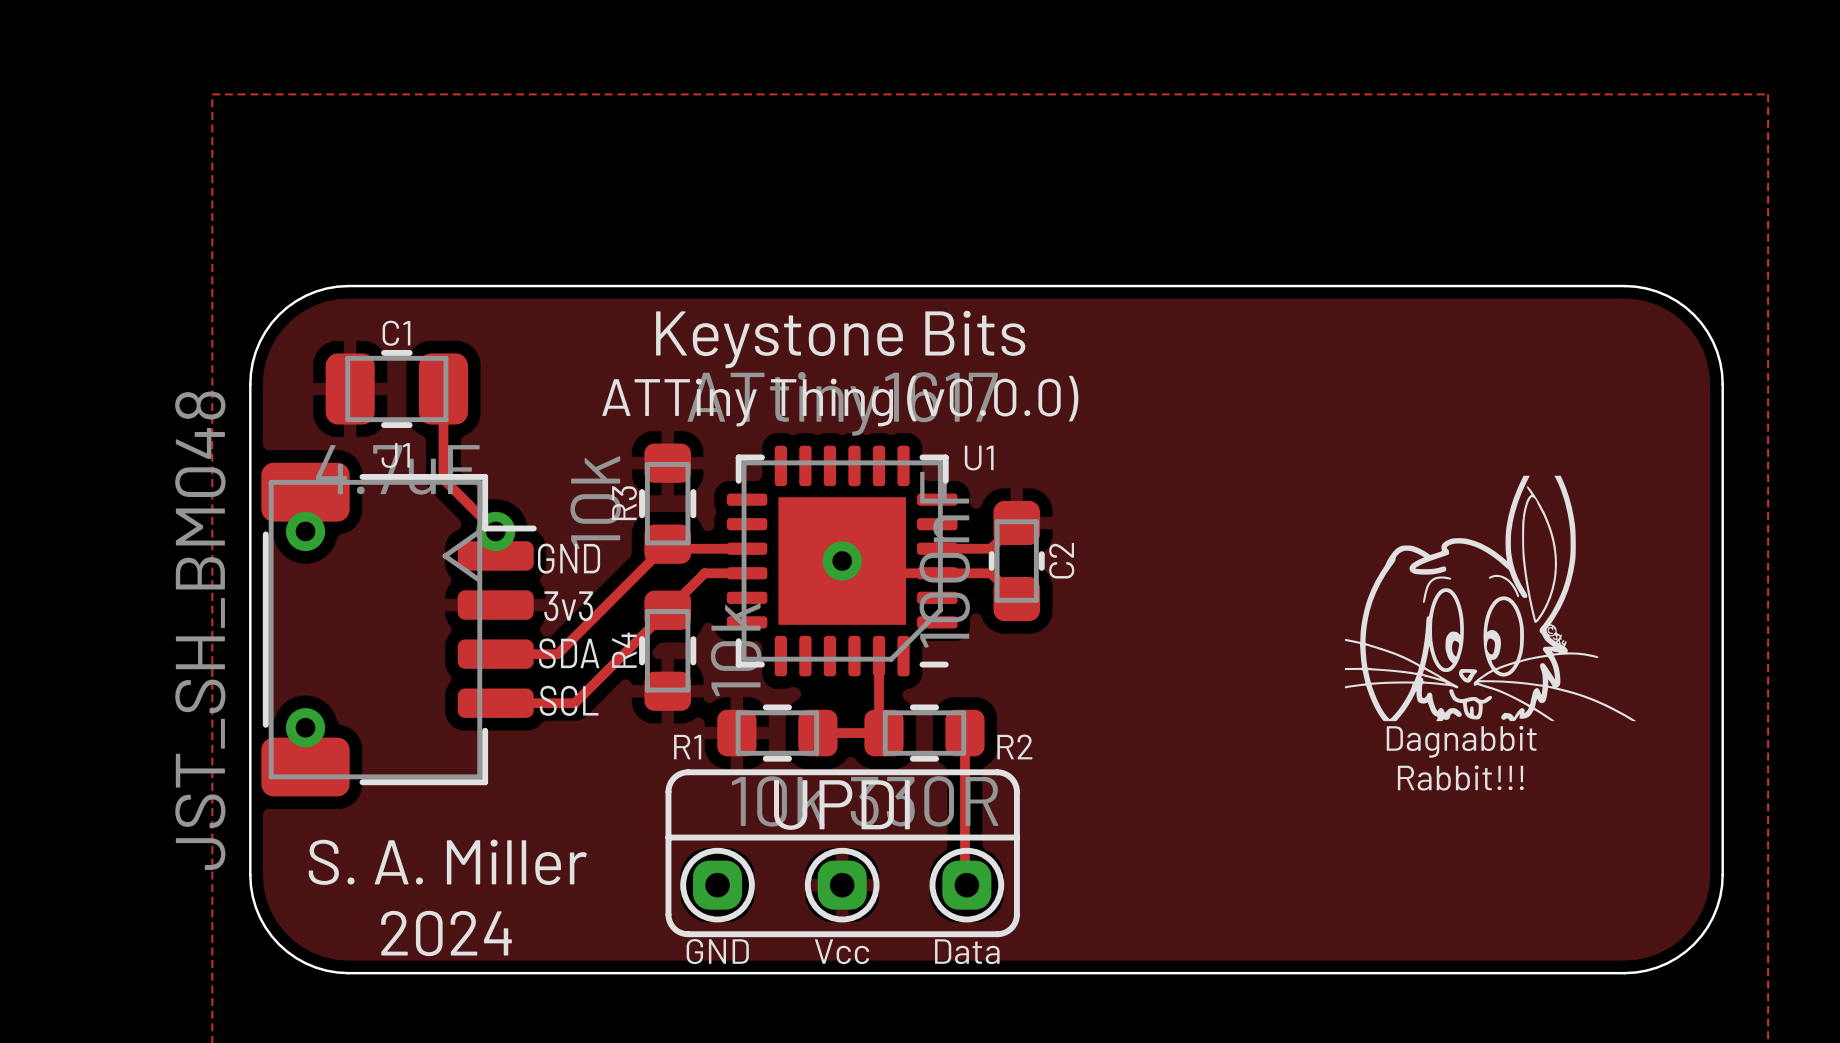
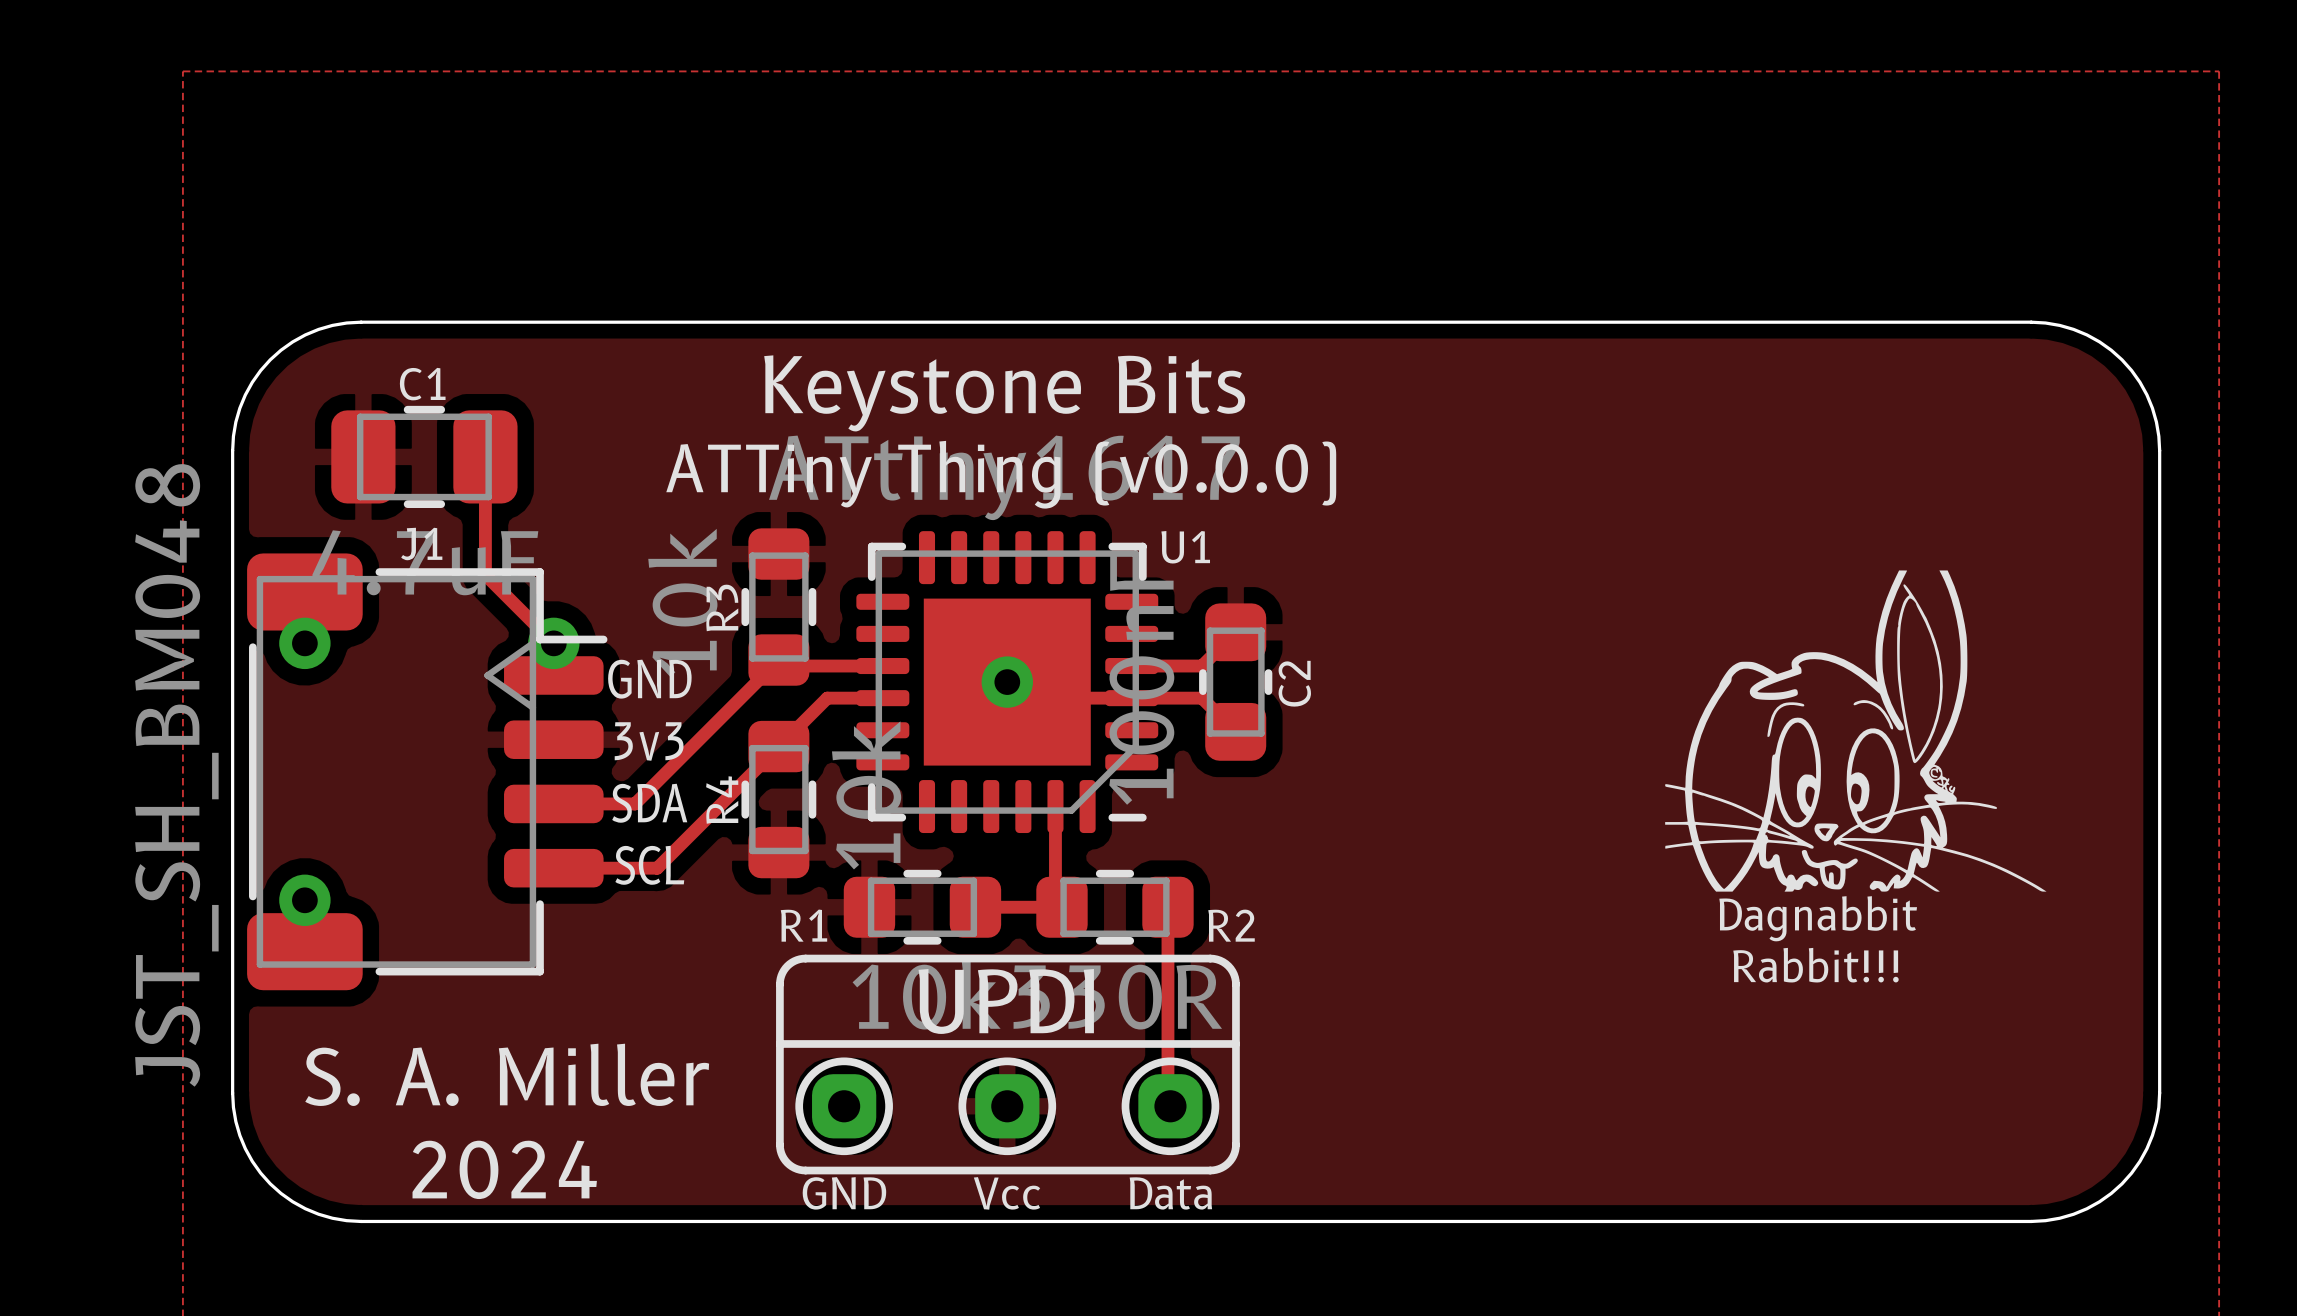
text position: S. A. Miller (447, 862) -> S. A. Miller (507, 1074)
text position: 2024 (446, 933) -> 2024 (504, 1169)

